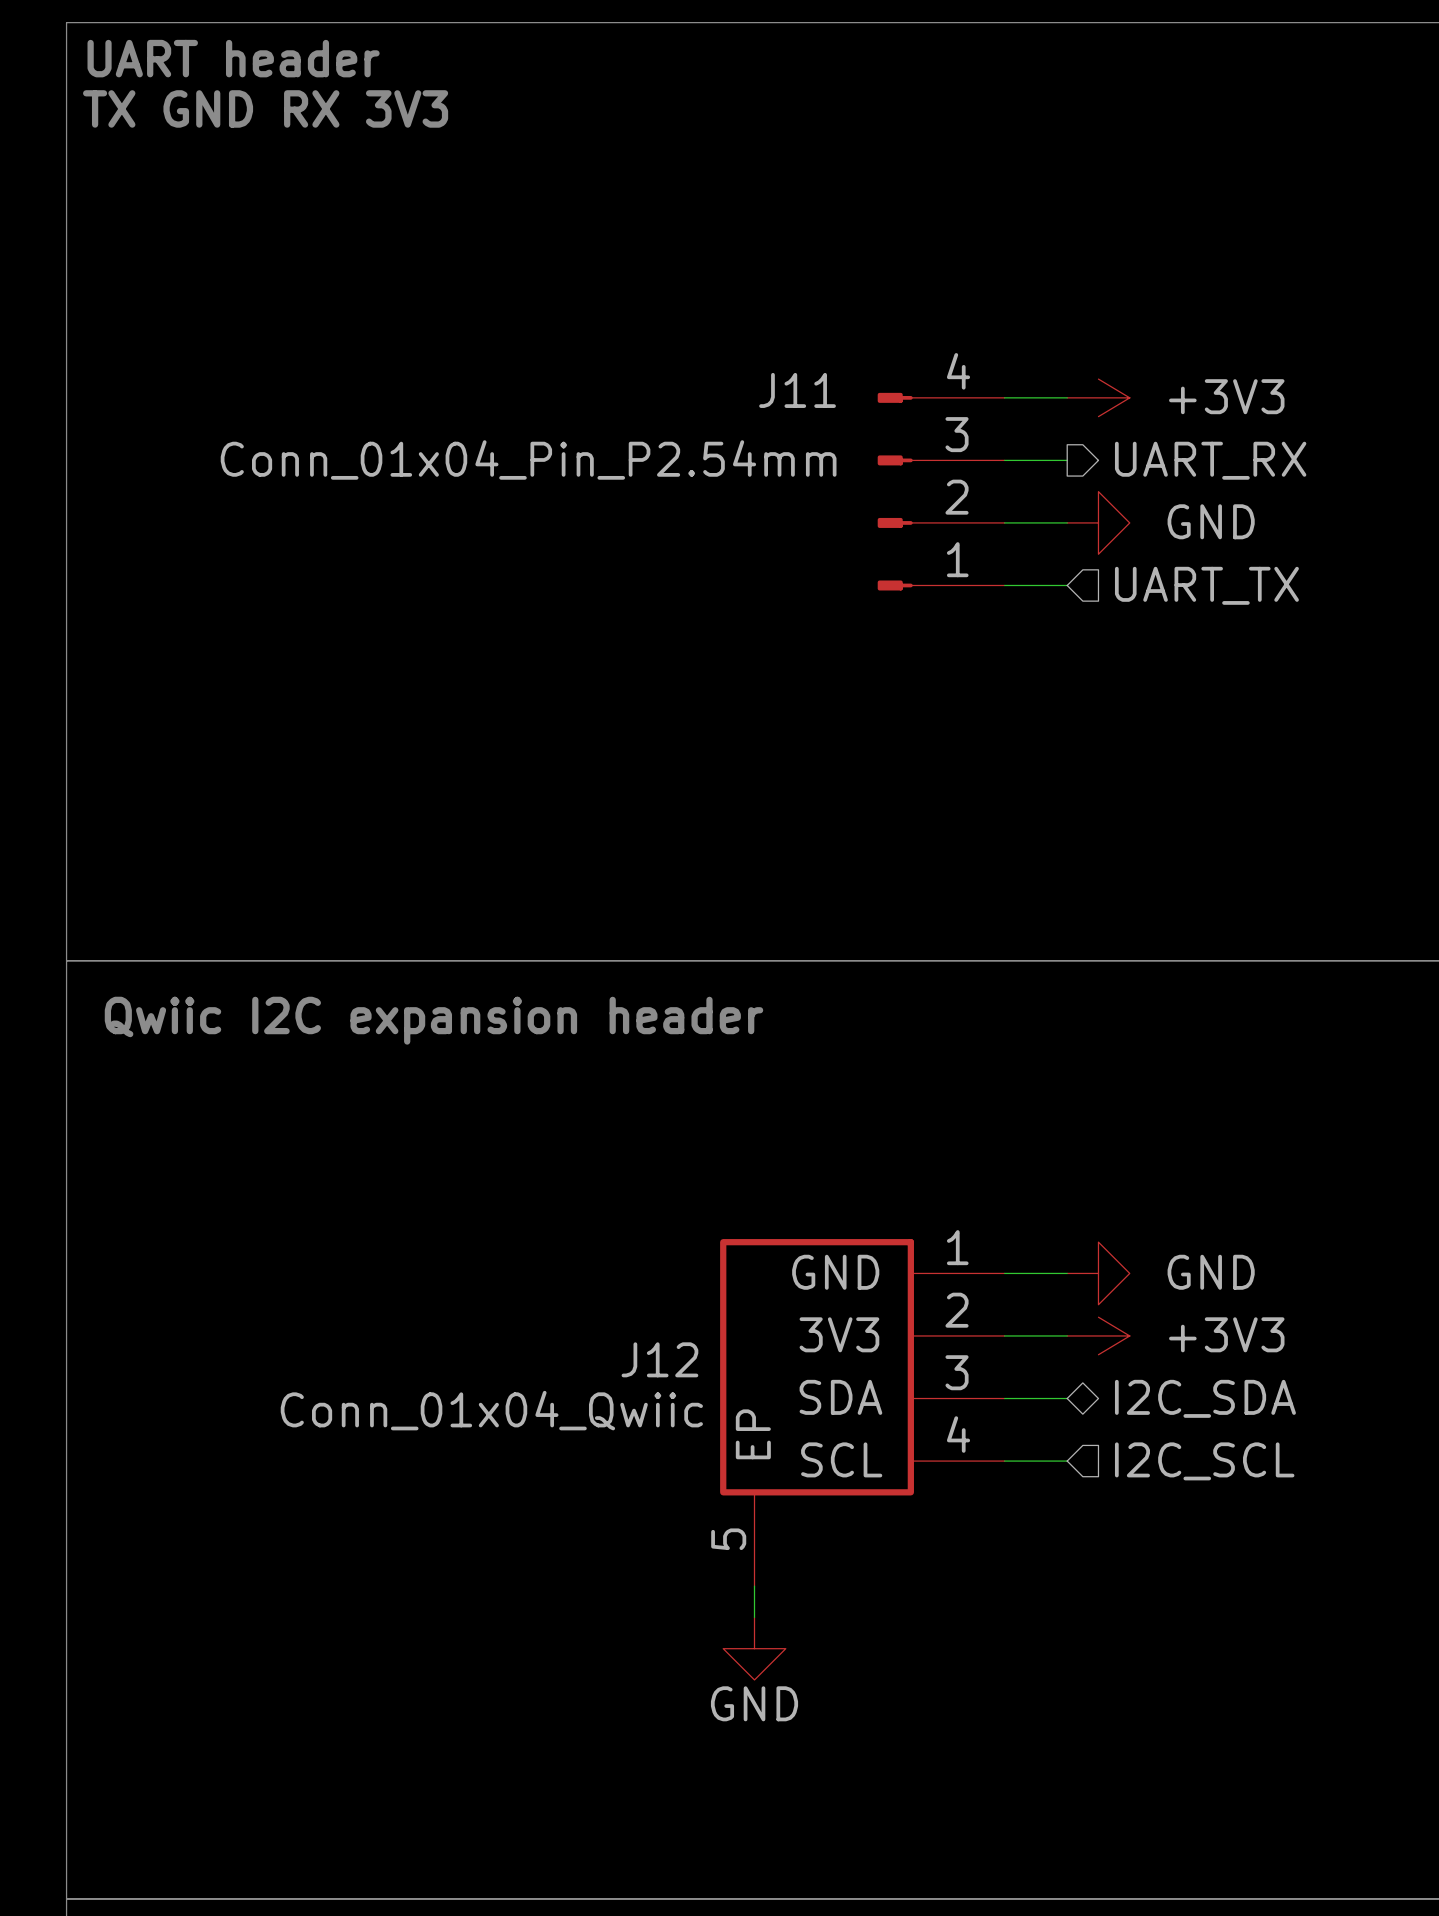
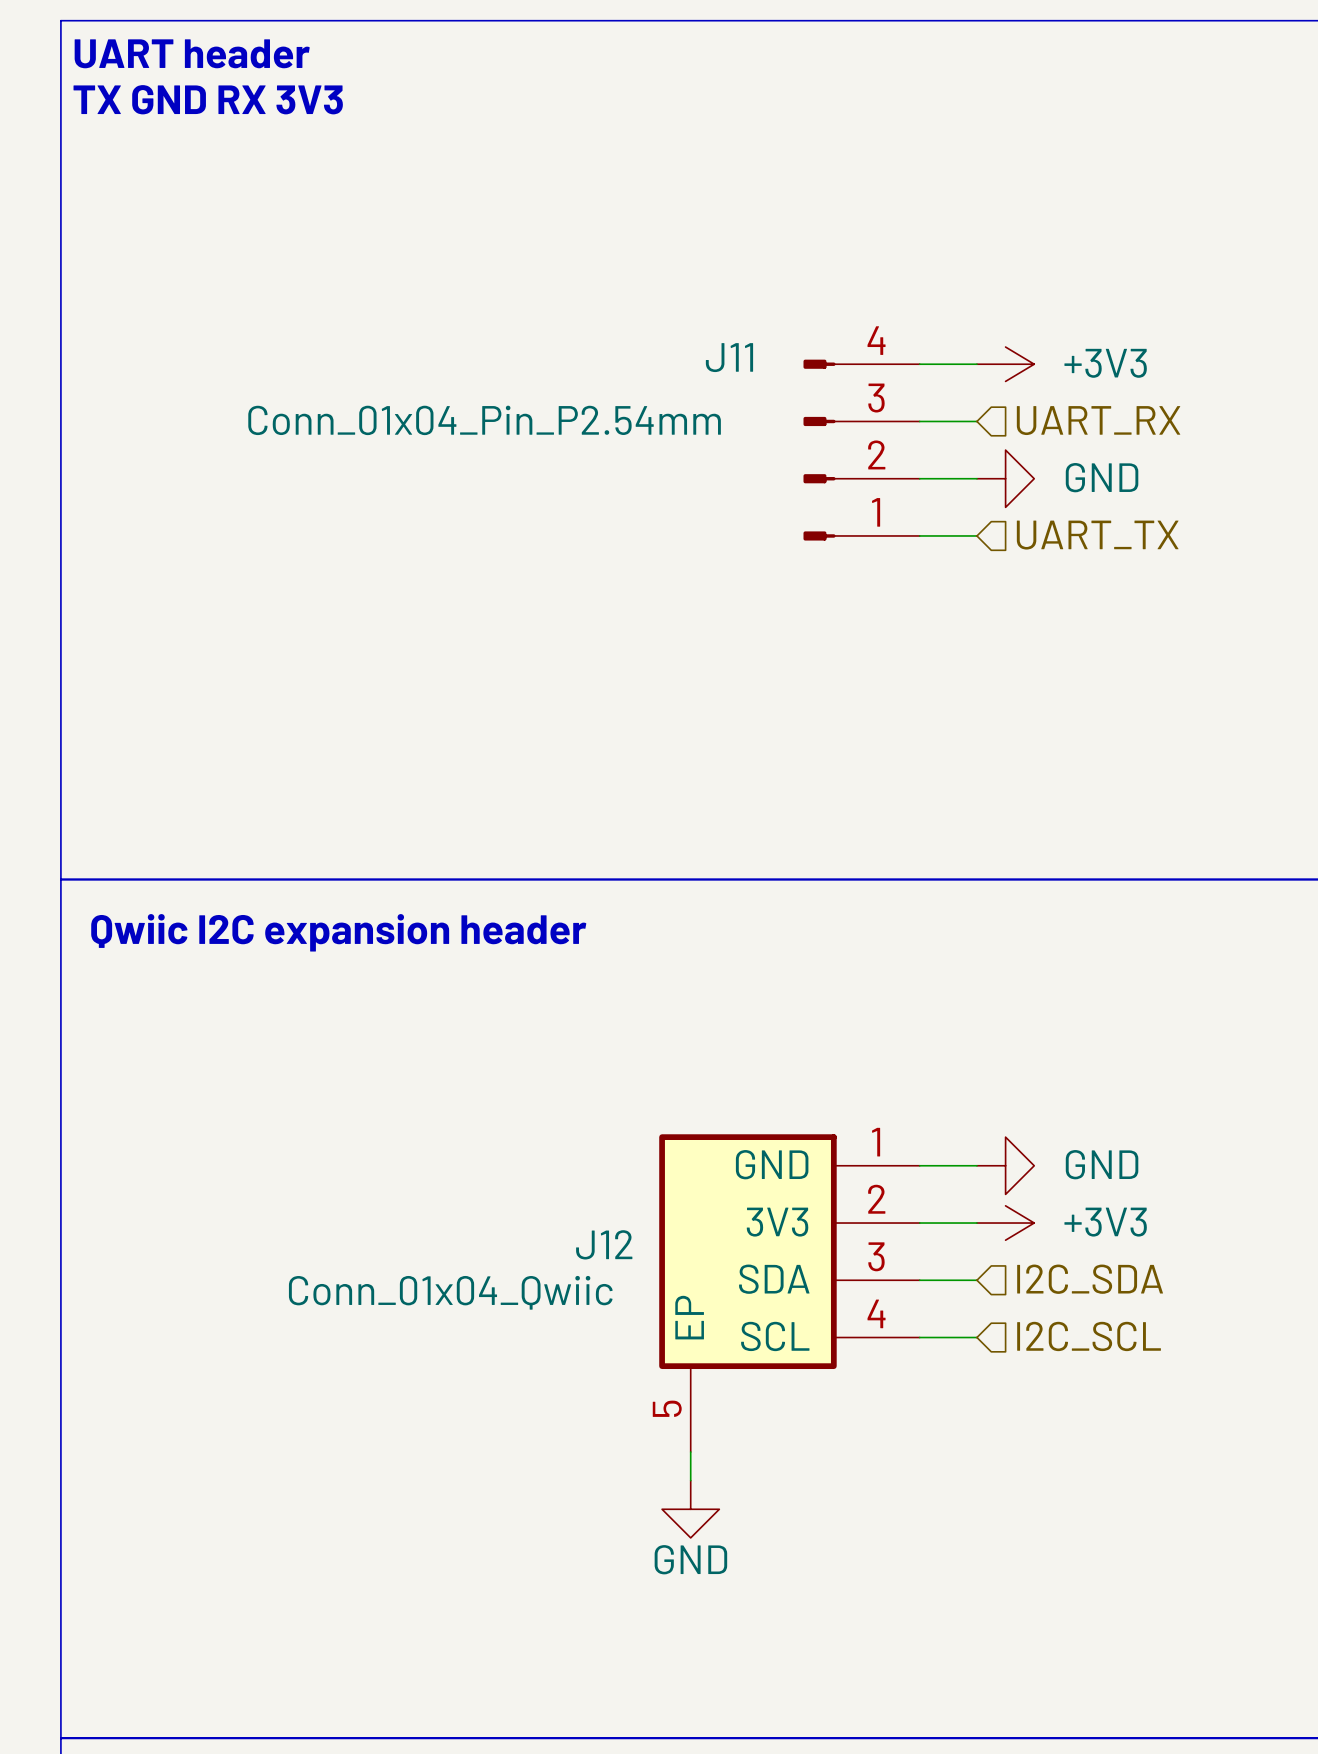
hierarchical label shape: output (1210, 460) -> input (1098, 420)
hierarchical label shape: bidirectional (1205, 1398) -> input (1090, 1279)

